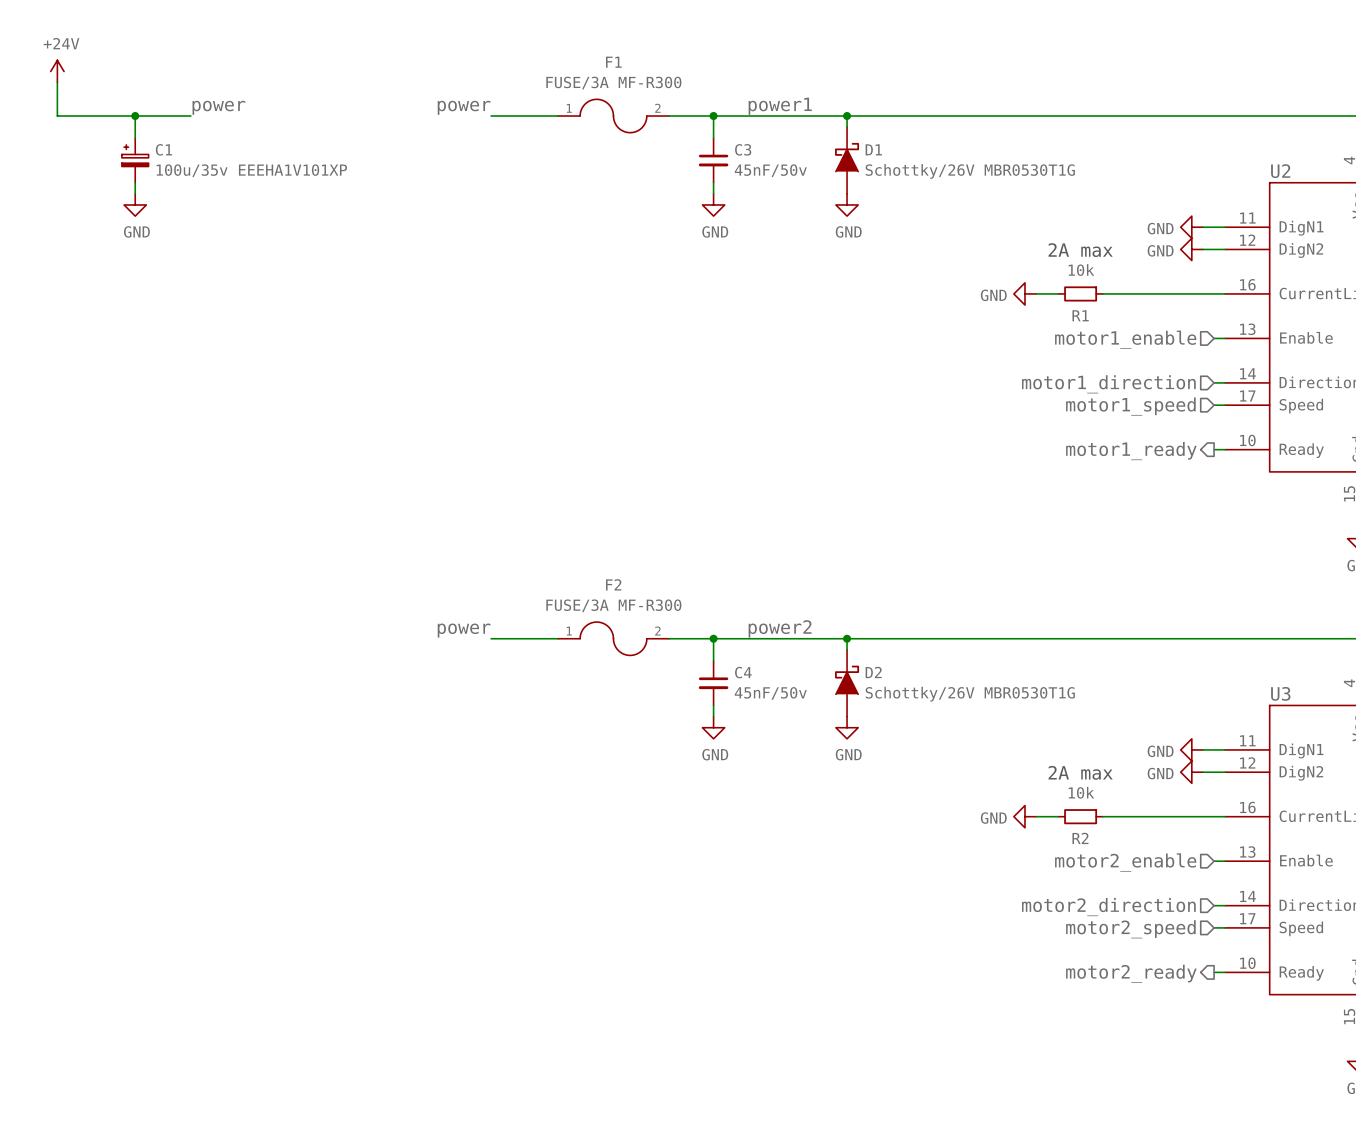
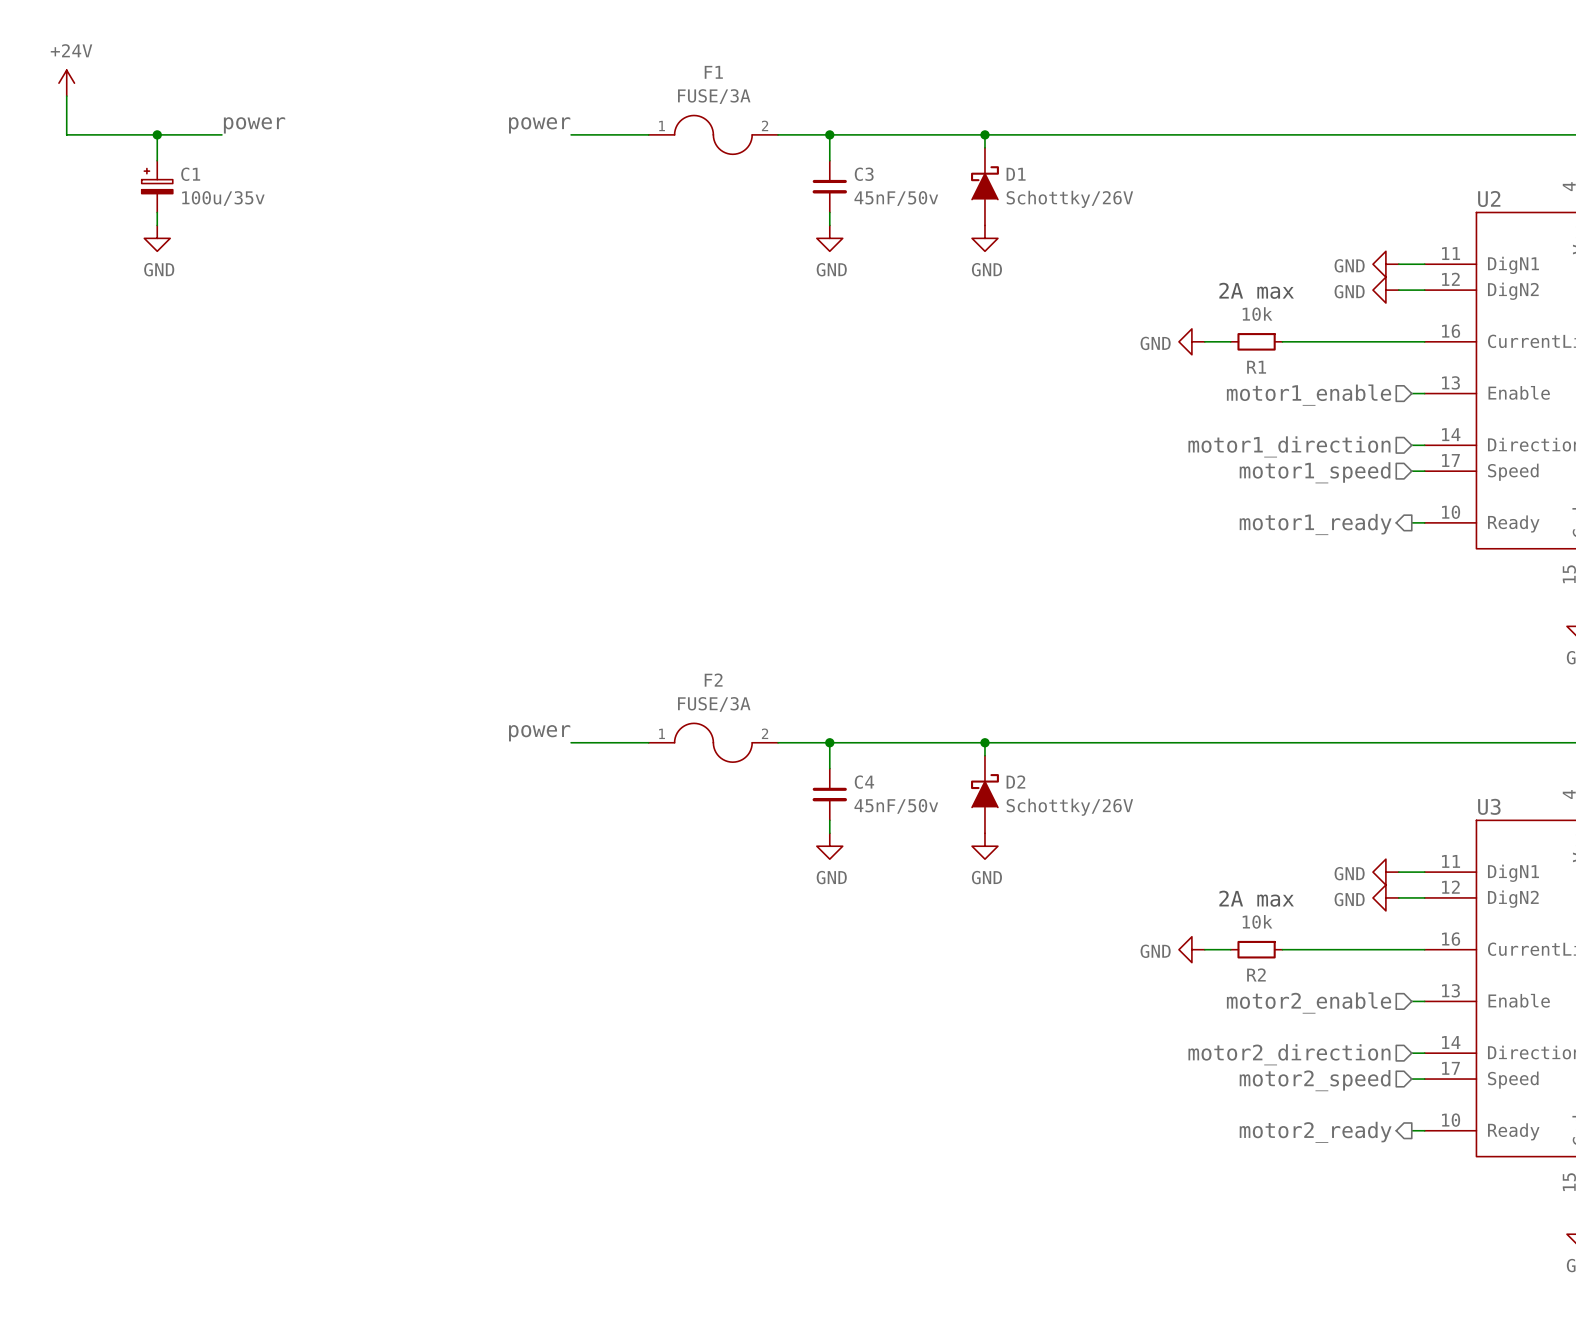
F1 value: FUSE/3A MF-R300 (613, 83) -> FUSE/3A (714, 96)
label: power1 (780, 106) -> none
C1 value: 100u/35v EEEHA1V101XP (251, 170) -> 100u/35v (223, 198)
D1 value: Schottky/26V MBR0530T1G (970, 171) -> Schottky/26V (1069, 199)
F2 value: FUSE/3A MF-R300 (613, 605) -> FUSE/3A (714, 704)
label: power2 (780, 628) -> none
D2 value: Schottky/26V MBR0530T1G (970, 694) -> Schottky/26V (1069, 807)

